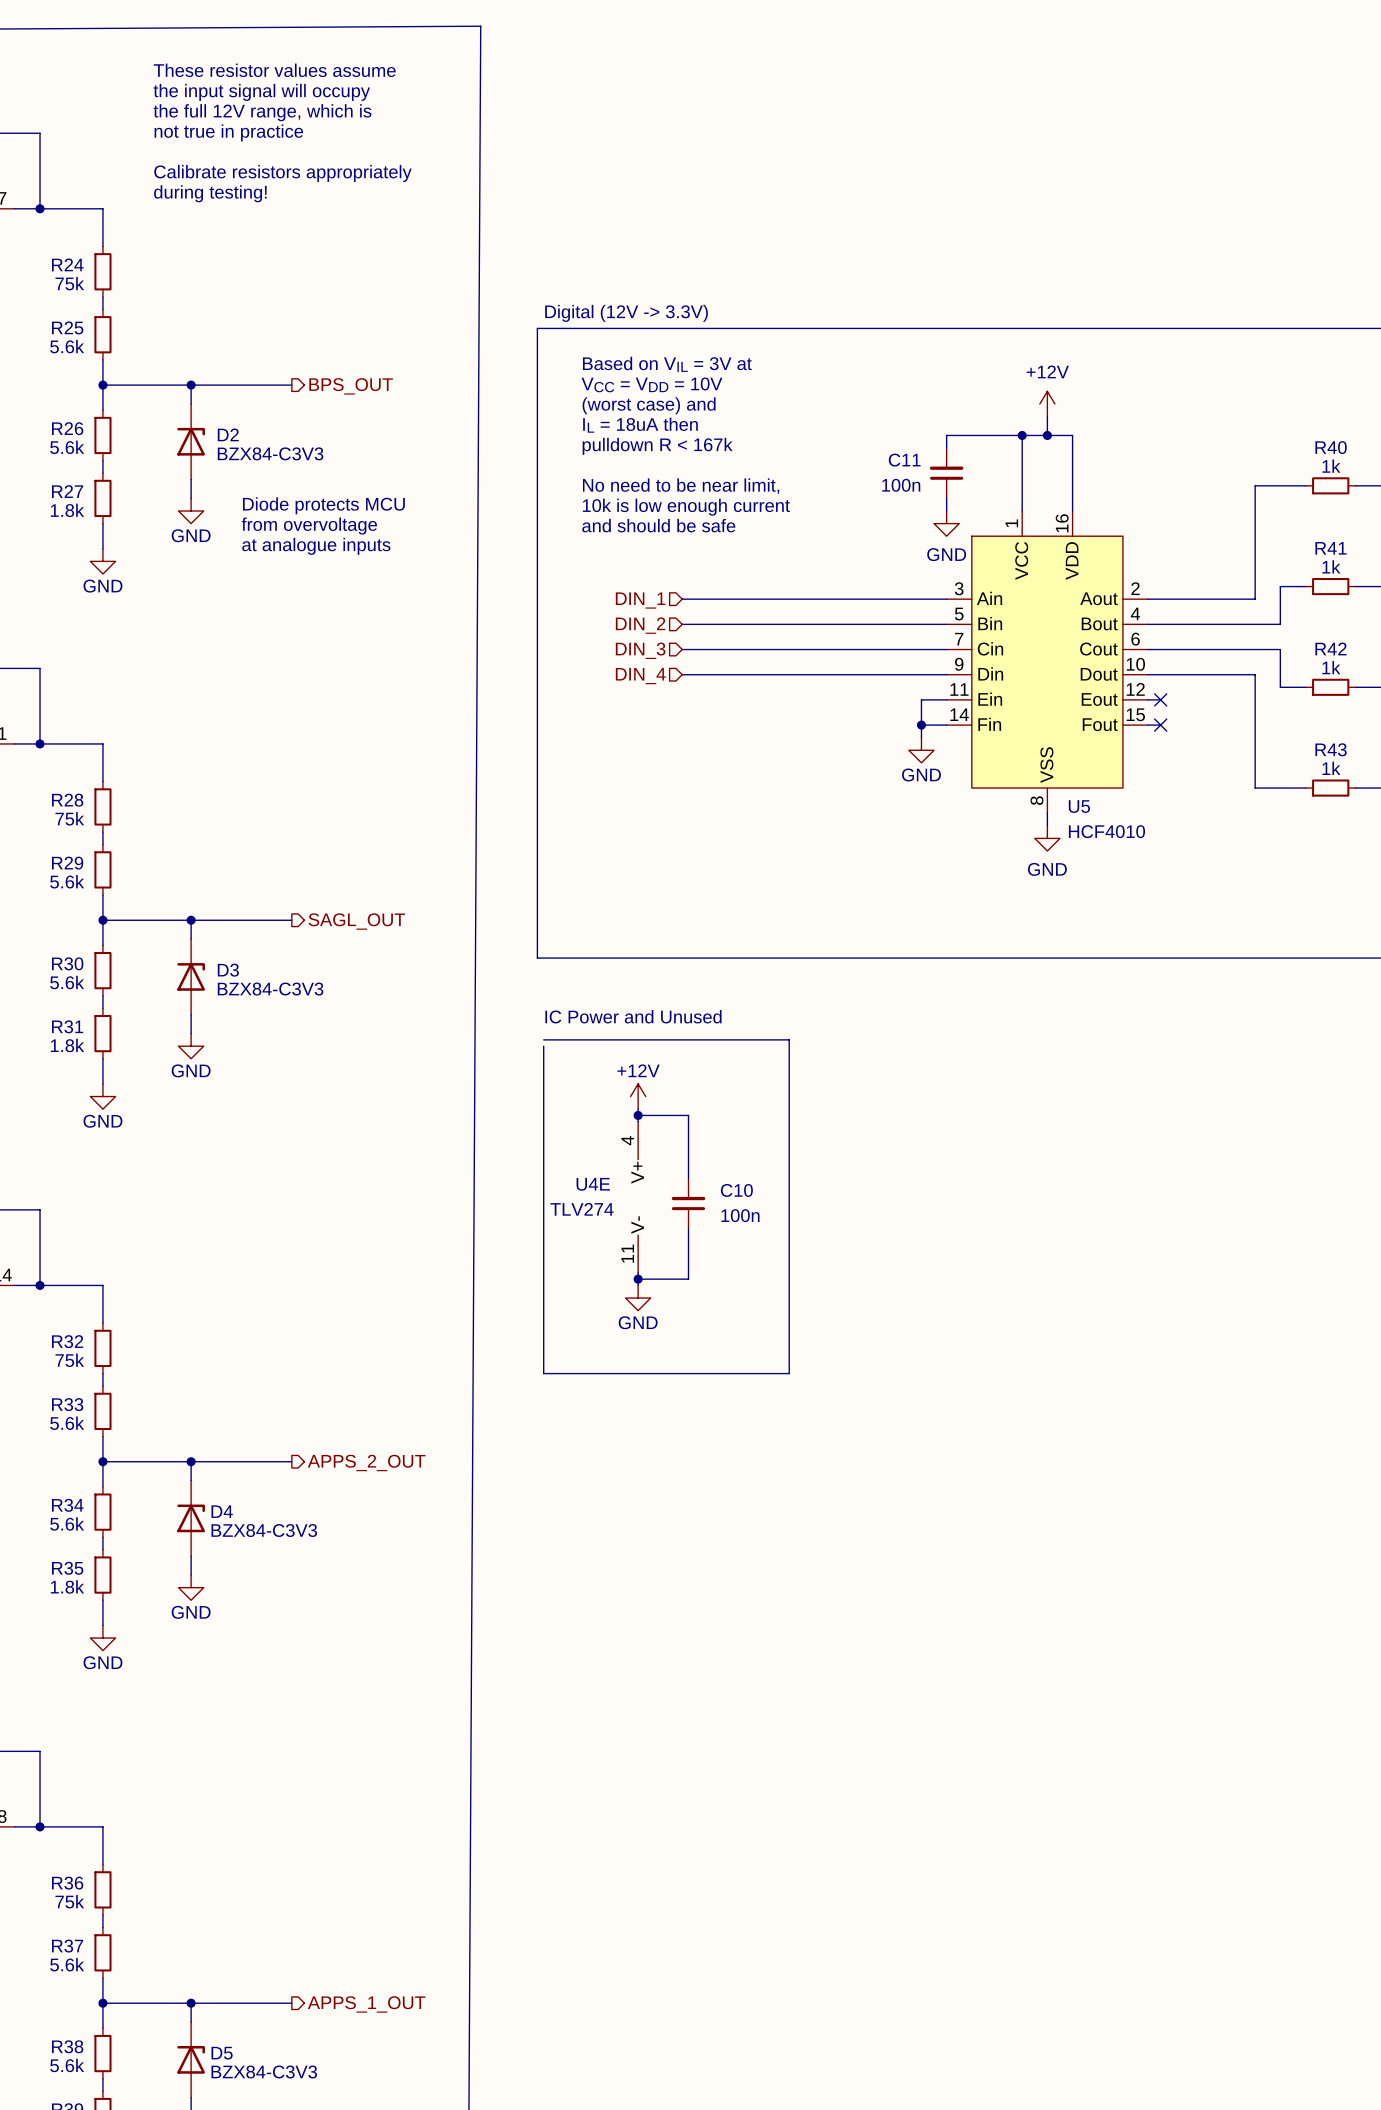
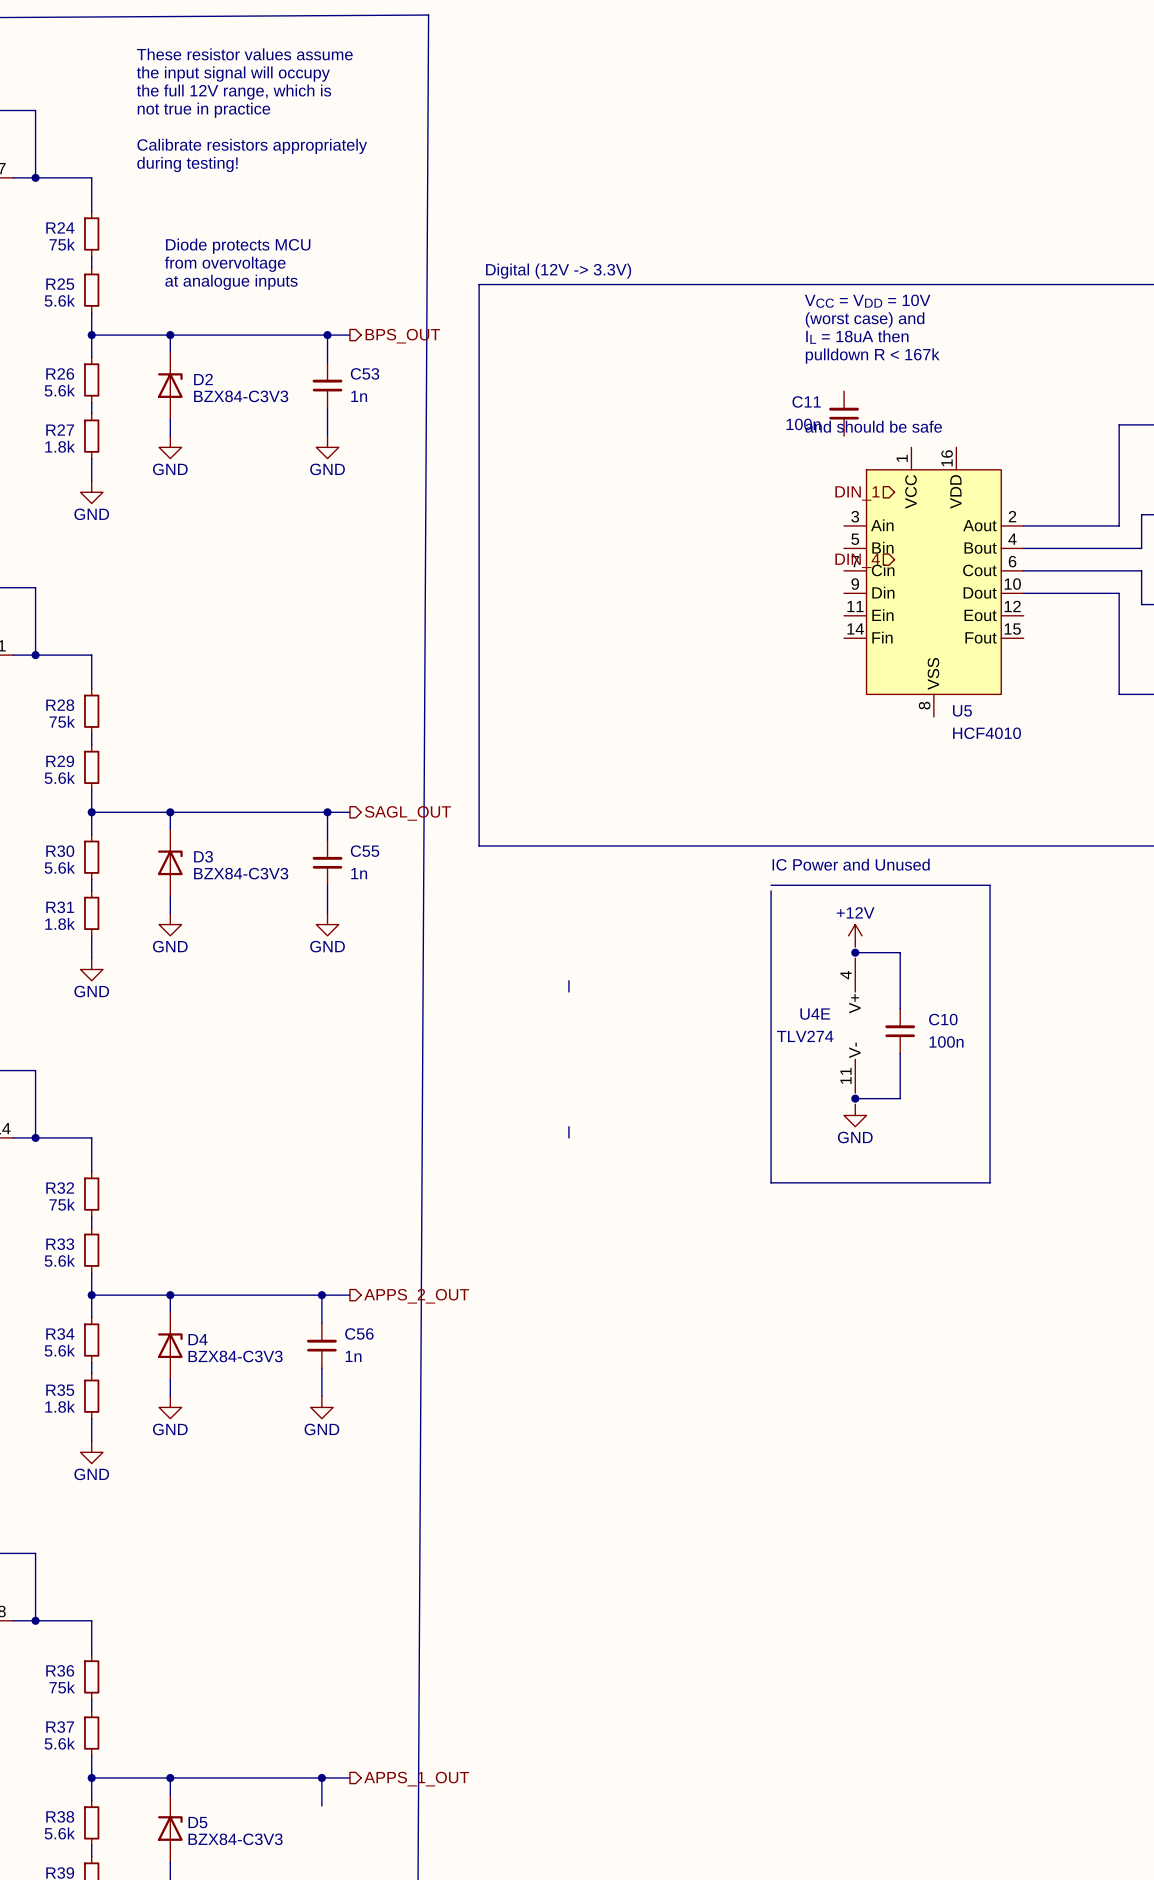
text: none -> VCC = VDD = 10V (867, 301)
text: Based on VIL = 3V at (667, 364) -> none
text: none -> (worst case) and (865, 319)
text: VCC = VDD = 10V (651, 384) -> none
wire: none -> (260, 335) (349, 335)
wire: none -> (327, 335) (327, 363)
junction: none -> (327, 335)
hierarchical label position: BPS_OUT (351, 386) -> BPS_OUT (402, 336)
text: none -> IL = 18uA then (857, 337)
power symbol: +12V (1047, 403) -> none
text: (worst case) and (649, 405) -> none
text: none -> pulldown R < 167k (872, 356)
wire: (1047, 416) (1047, 435) -> none
text: IL = 18uA then (640, 425) -> none
wire: (1022, 435) (1022, 511) -> none
junction: (1022, 435) -> none
junction: (1047, 435) -> none
C53: none -> 1n (327, 385)
text: pulldown R < 167k (657, 446) -> none
wire: (946, 448) (946, 435) (1072, 435) (1072, 511) -> none
wire: none -> (327, 408) (327, 436)
text: No need to be near limit, (681, 486) -> none
text: none -> and should be safe (873, 426)
wire: (946, 498) (946, 511) -> none
text position: Diode protects MCU (323, 505) -> Diode protects MCU (238, 246)
text: 10k is low enough current (686, 507) -> none
power symbol: none -> GND (327, 447)
power symbol: GND (946, 523) -> none
text: and should be safe (658, 525) -> none
text position: from overvoltage (309, 526) -> from overvoltage (225, 264)
text position: at analogue inputs (316, 546) -> at analogue inputs (231, 282)
hierarchical label: none -> DIN_1 (857, 493)
wire: (682, 599) (946, 599) -> none
hierarchical label: DIN_1 (640, 600) -> none
wire: (682, 624) (946, 624) -> none
hierarchical label: DIN_2 (640, 625) -> none
hierarchical label: none -> DIN_4 (857, 560)
wire: (682, 649) (946, 649) -> none
hierarchical label: DIN_3 (640, 650) -> none
wire: (682, 674) (946, 674) -> none
hierarchical label: DIN_4 (640, 676) -> none
wire: (946, 699) (921, 699) (921, 737) -> none
wire: (1148, 699) (1160, 699) -> none
no-connect mark: (1160, 699) -> none
wire: (921, 725) (946, 725) -> none
junction: (921, 725) -> none
wire: (1148, 725) (1160, 725) -> none
no-connect mark: (1160, 725) -> none
power symbol: GND (921, 750) -> none
wire: (1047, 813) (1047, 825) -> none
power symbol: GND (1047, 838) -> none
wire: none -> (260, 812) (349, 812)
wire: none -> (327, 812) (327, 840)
junction: none -> (327, 812)
hierarchical label position: SAGL_OUT (356, 921) -> SAGL_OUT (407, 813)
C55: none -> 1n (327, 862)
text: none -> IC Power and Unused (851, 864)
wire: none -> (327, 885) (327, 913)
line: none -> (771, 885) (990, 885) (990, 1182) (771, 1182) (771, 890)
text: IC Power and Unused (633, 1016) -> none
line: (543, 1039) (789, 1039) (789, 1373) (543, 1373) (543, 1046) -> none
power symbol: none -> GND (327, 924)
power symbol: none -> +12V (855, 935)
wire: none -> (855, 952) (900, 952) (900, 1008)
junction: none -> (855, 952)
power symbol: +12V (638, 1096) -> none
wire: (638, 1115) (688, 1115) (688, 1178) -> none
junction: (638, 1115) -> none
wire: none -> (900, 1053) (900, 1098) (855, 1098)
U4E position: (638, 1197) -> (855, 1025)
C10 position: (688, 1203) -> (900, 1031)
wire: (688, 1228) (688, 1279) (638, 1279) -> none
junction: none -> (855, 1098)
power symbol: none -> GND (855, 1115)
junction: (638, 1279) -> none
power symbol: GND (638, 1298) -> none
wire: none -> (260, 1295) (349, 1295)
wire: none -> (321, 1295) (321, 1323)
junction: none -> (321, 1295)
hierarchical label position: APPS_2_OUT (366, 1462) -> APPS_2_OUT (416, 1296)
C56: none -> 1n (321, 1345)
wire: none -> (321, 1368) (321, 1396)
power symbol: none -> GND (321, 1407)
wire: none -> (260, 1777) (349, 1777)
wire: none -> (321, 1777) (321, 1806)
junction: none -> (321, 1777)
hierarchical label position: APPS_1_OUT (366, 2004) -> APPS_1_OUT (416, 1779)

